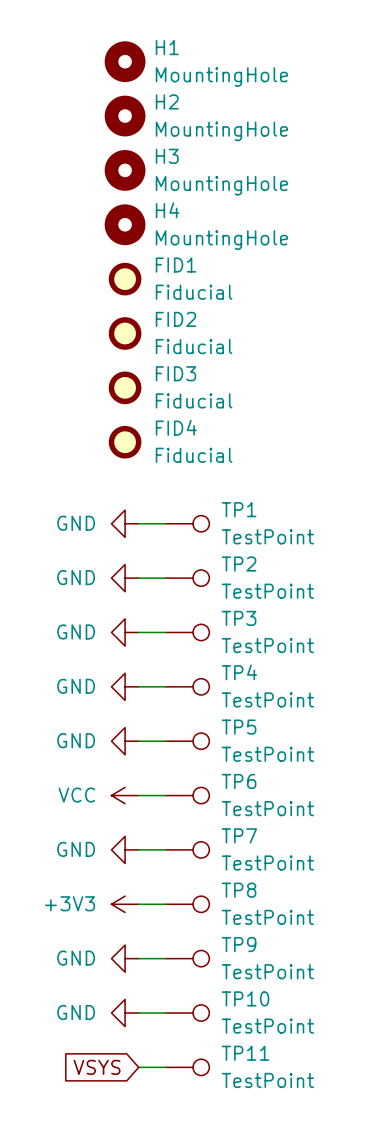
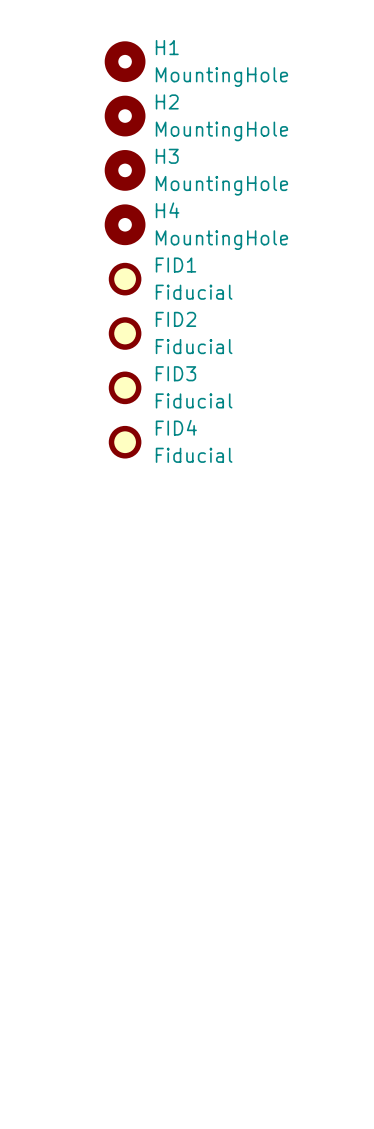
power symbol: GND (125, 523) -> none
wire: (138, 523) (165, 523) -> none
TP1: TestPoint (187, 523) -> none
power symbol: GND (125, 578) -> none
wire: (138, 578) (165, 578) -> none
TP2: TestPoint (187, 578) -> none
power symbol: GND (125, 632) -> none
wire: (138, 632) (165, 632) -> none
TP3: TestPoint (187, 632) -> none
power symbol: GND (125, 686) -> none
wire: (138, 686) (165, 686) -> none
TP4: TestPoint (187, 686) -> none
power symbol: GND (125, 741) -> none
wire: (138, 741) (165, 741) -> none
TP5: TestPoint (187, 741) -> none
power symbol: VCC (125, 795) -> none
wire: (138, 795) (165, 795) -> none
TP6: TestPoint (187, 795) -> none
power symbol: GND (125, 849) -> none
wire: (138, 849) (165, 849) -> none
TP7: TestPoint (187, 849) -> none
power symbol: +3V3 (125, 904) -> none
wire: (138, 904) (165, 904) -> none
TP8: TestPoint (187, 904) -> none
power symbol: GND (125, 958) -> none
wire: (138, 958) (165, 958) -> none
TP9: TestPoint (187, 958) -> none
power symbol: GND (125, 1013) -> none
wire: (138, 1013) (165, 1013) -> none
TP10: TestPoint (187, 1013) -> none
global label: VSYS (97, 1067) -> none
wire: (138, 1067) (165, 1067) -> none
TP11: TestPoint (187, 1067) -> none

